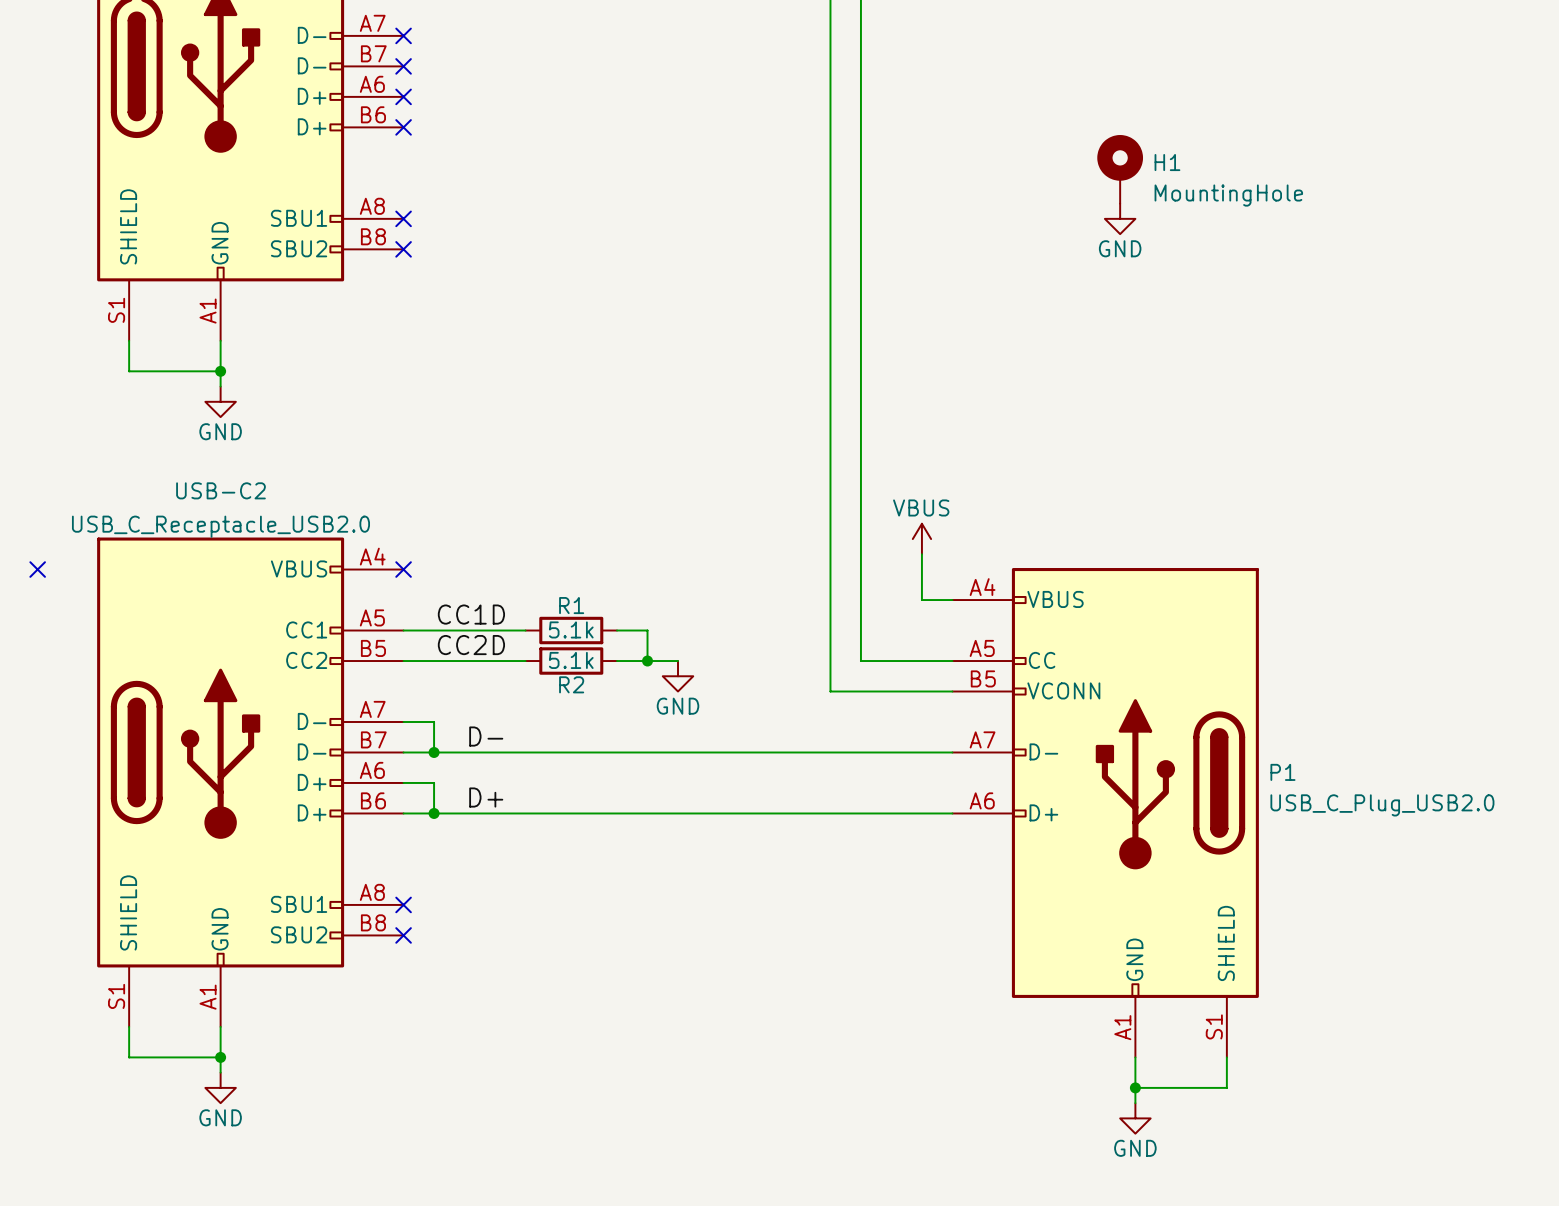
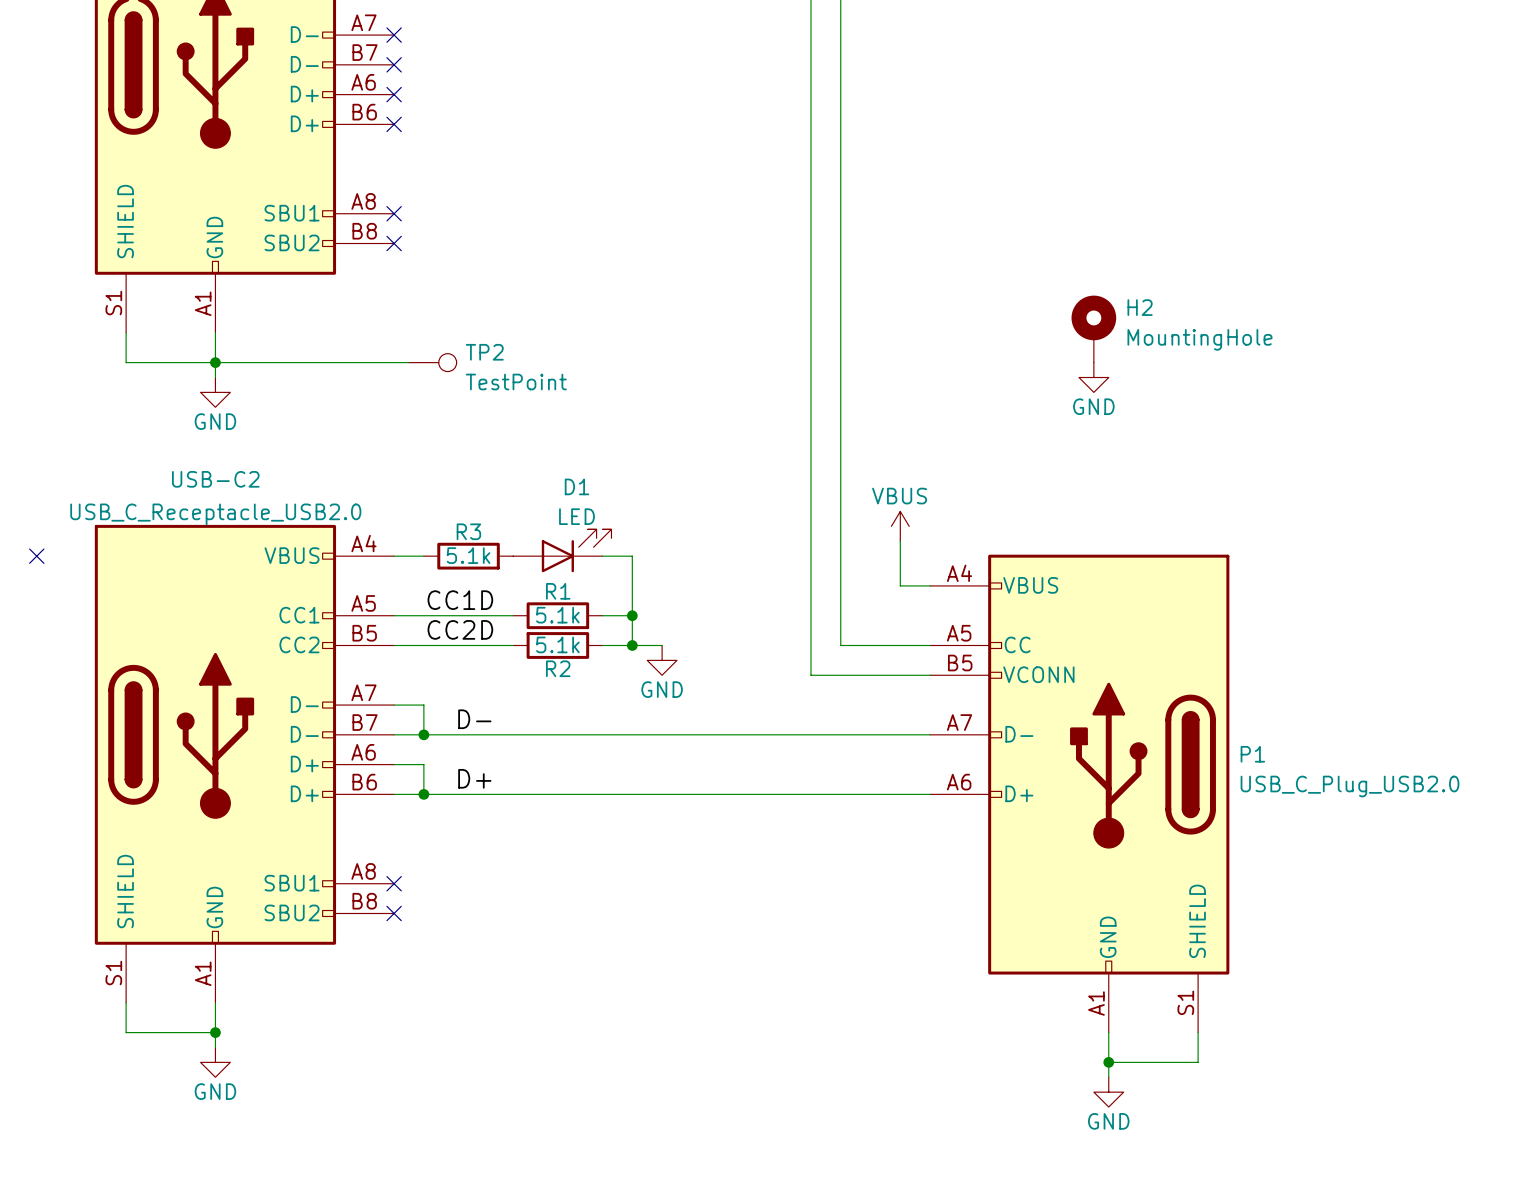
H1: MountingHole (1120, 169) -> none
power symbol position: GND (1120, 218) -> GND (1093, 377)
H2: none -> MountingHole (1093, 329)
wire: none -> (215, 362) (408, 362)
TP2: none -> TestPoint (432, 362)
D1: none -> LED (562, 550)
wire: none -> (394, 556) (423, 556)
no-connect mark: (403, 569) -> none
R3: none -> 5.1k (468, 556)
wire: none -> (602, 556) (632, 556) (632, 615)
junction: none -> (632, 615)

